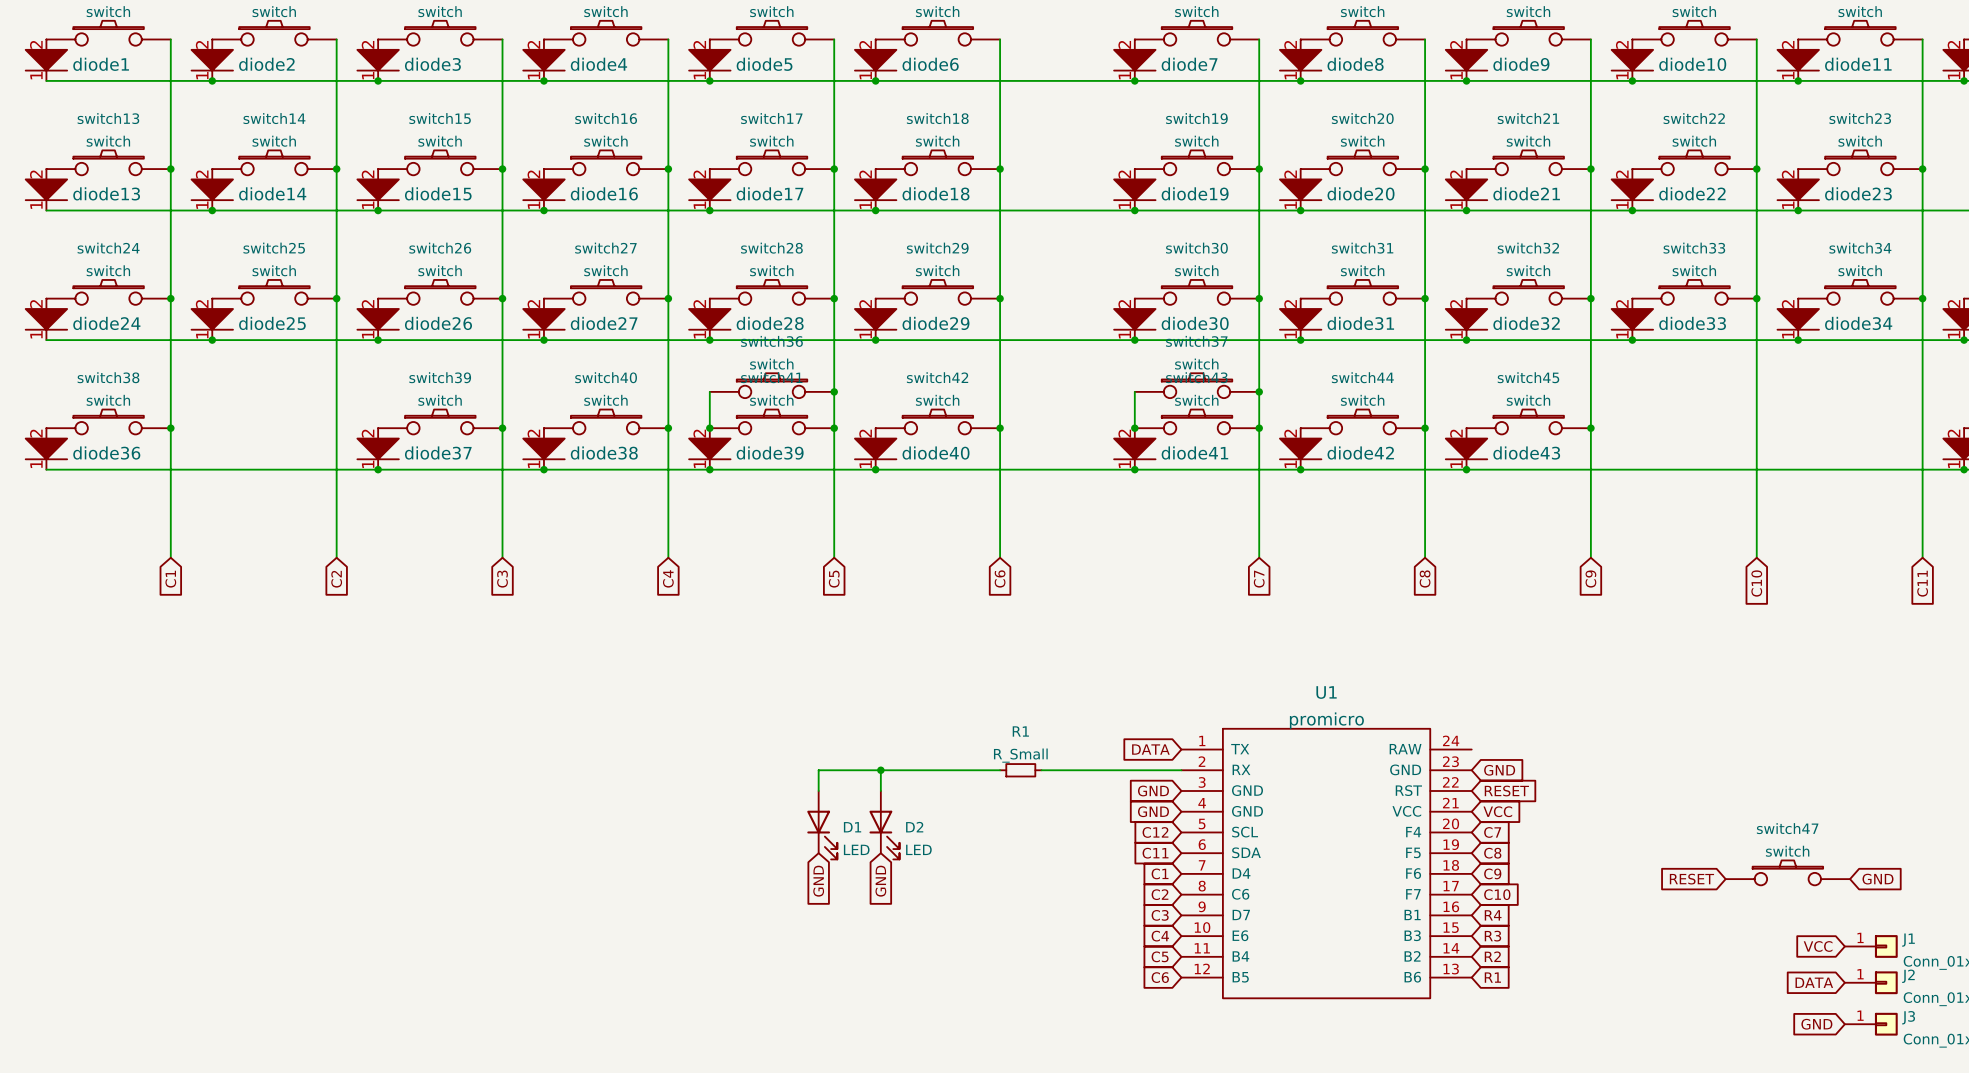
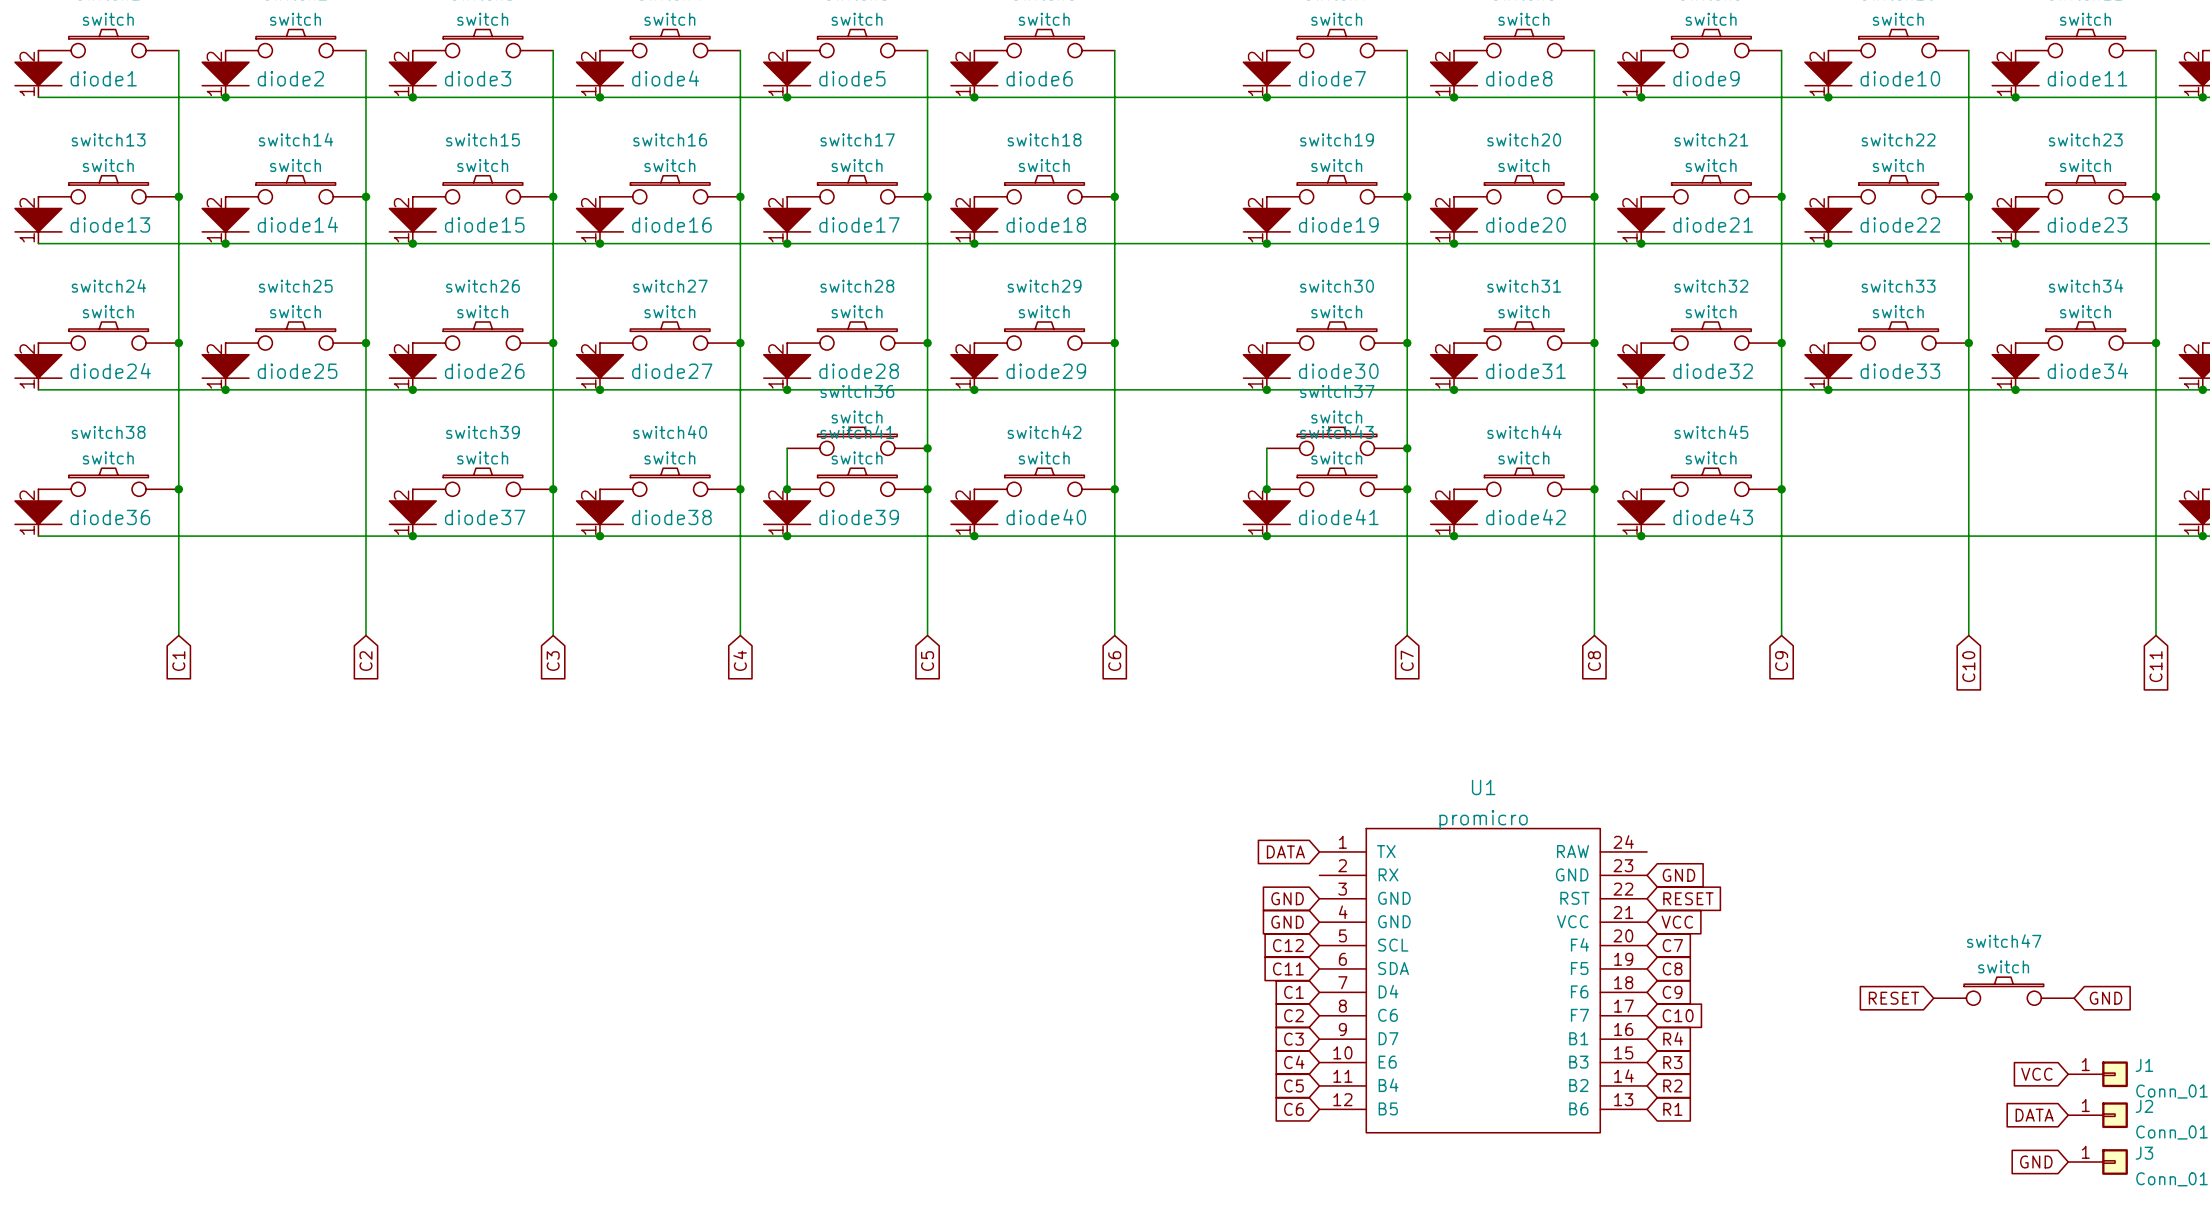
wire: (880, 770) (880, 790) -> none
junction: (880, 770) -> none
wire: (1000, 770) (818, 770) (818, 790) -> none
R1: R_Small (1020, 770) -> none
wire: (1041, 770) (1181, 770) -> none
D1: LED (822, 825) -> none
D2: LED (884, 825) -> none
global label: GND (818, 881) -> none
global label: GND (880, 881) -> none

